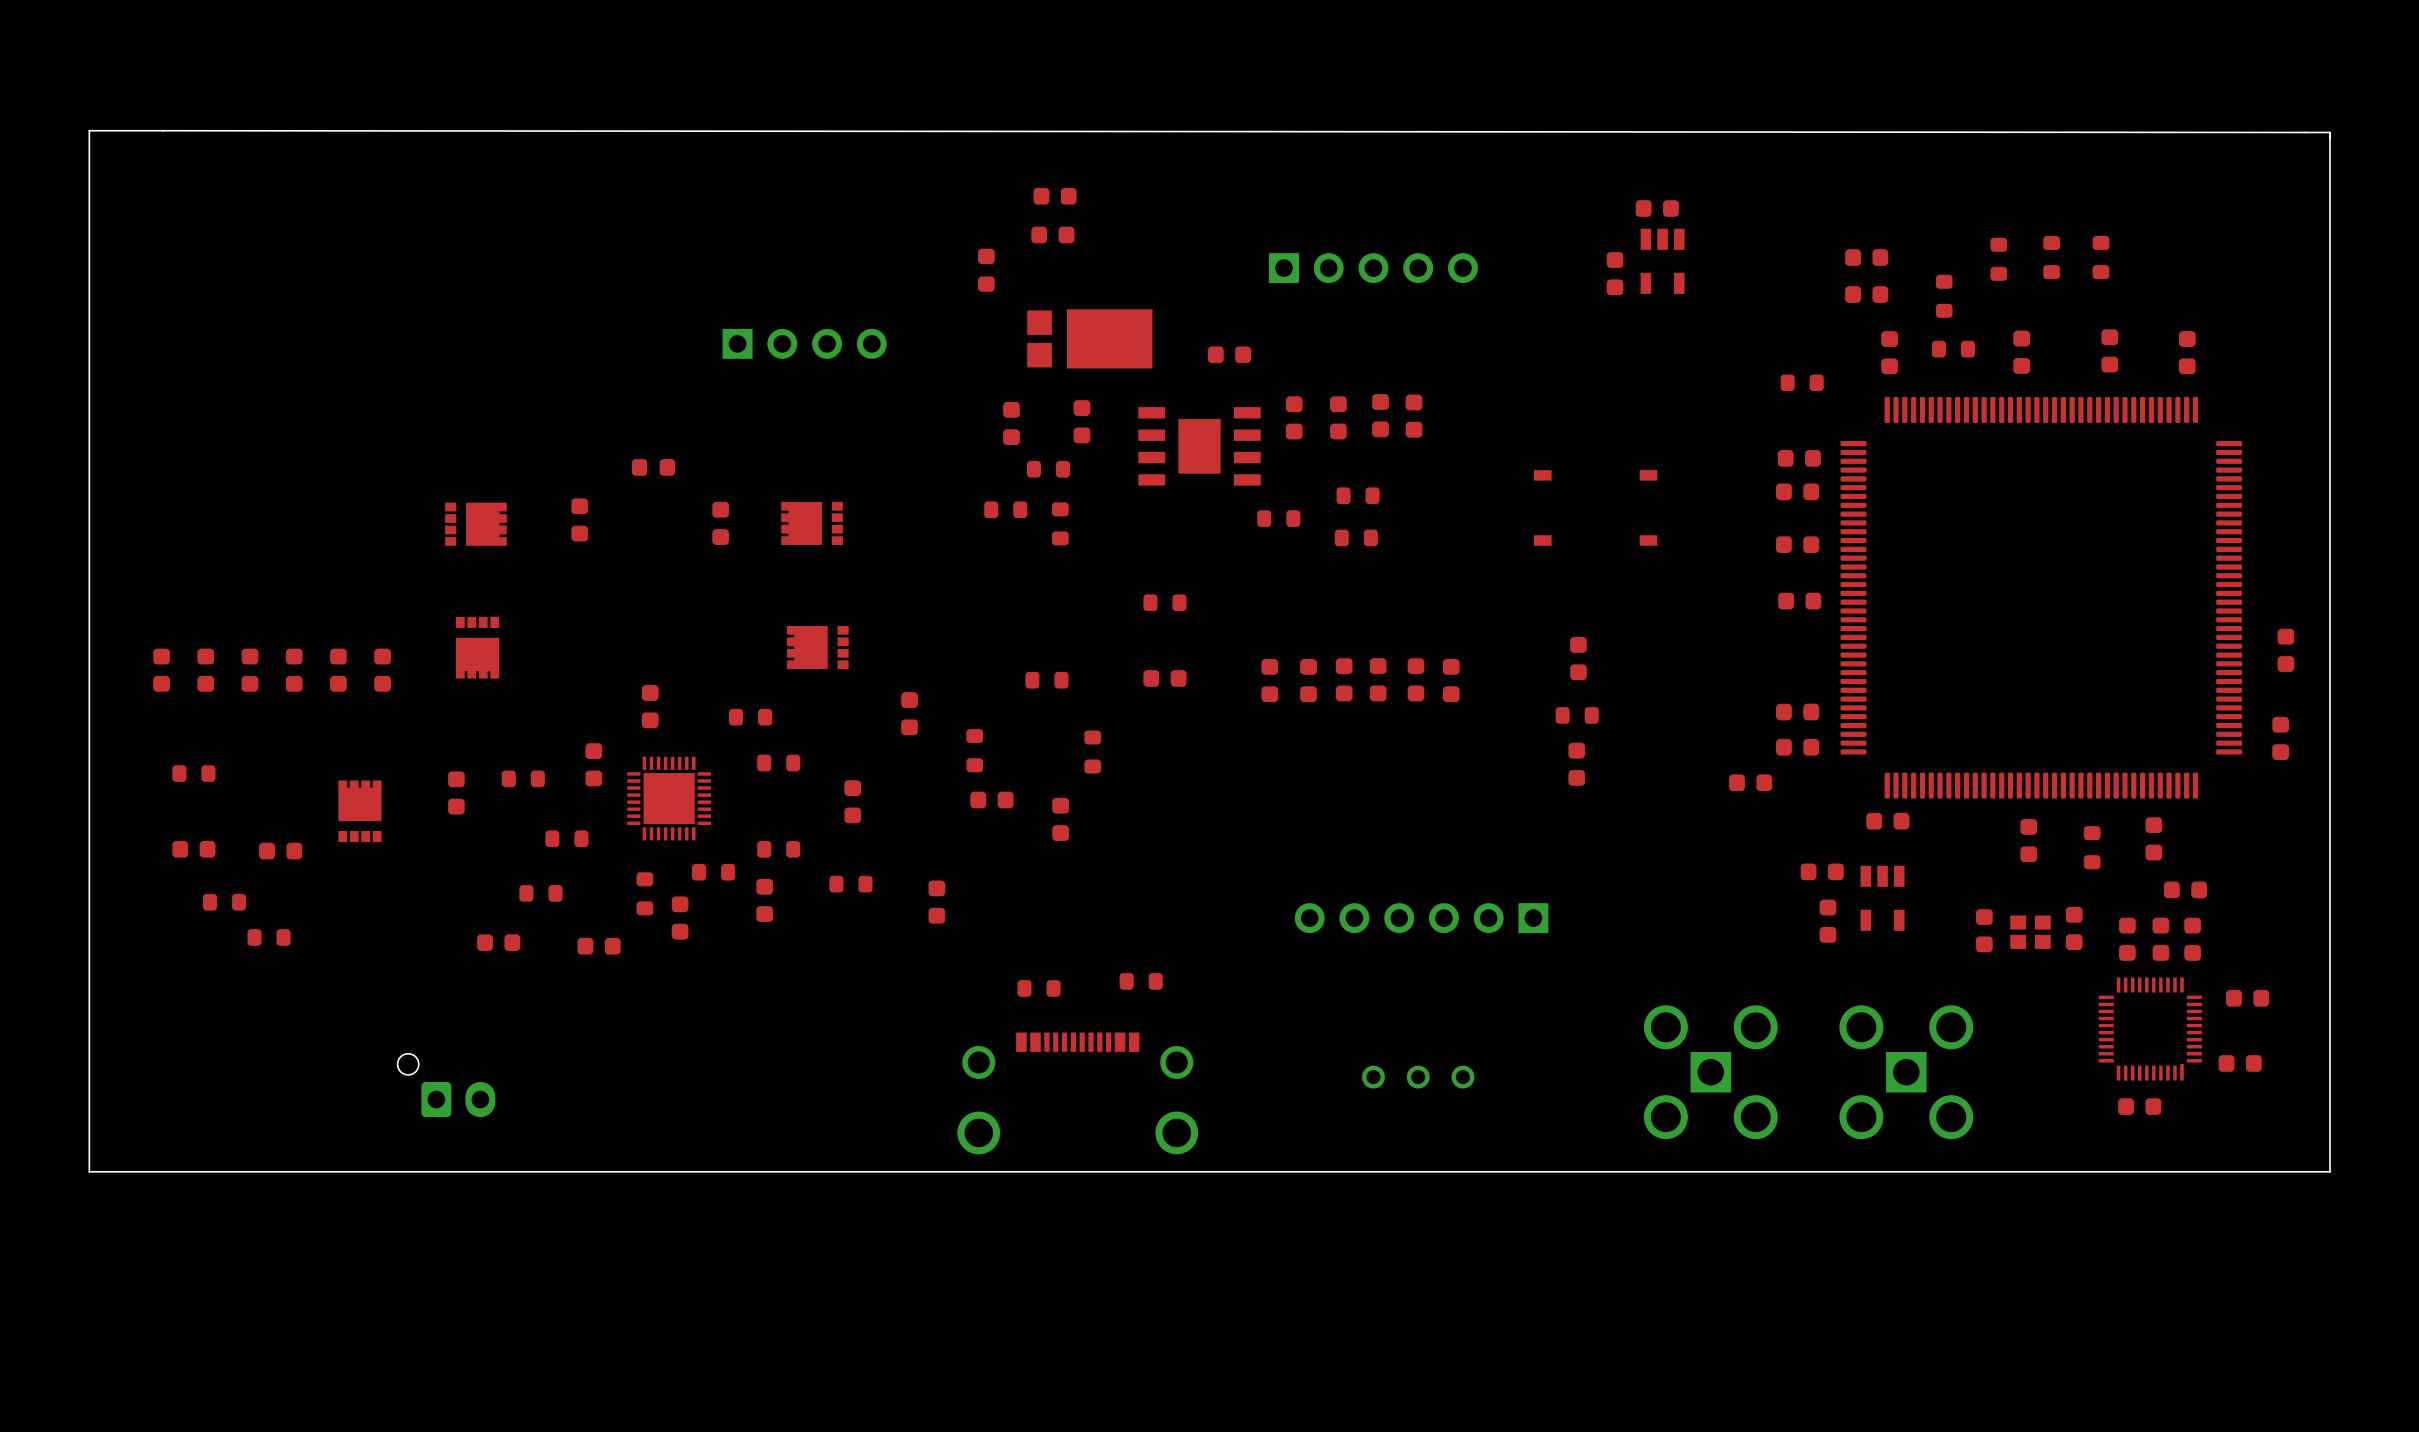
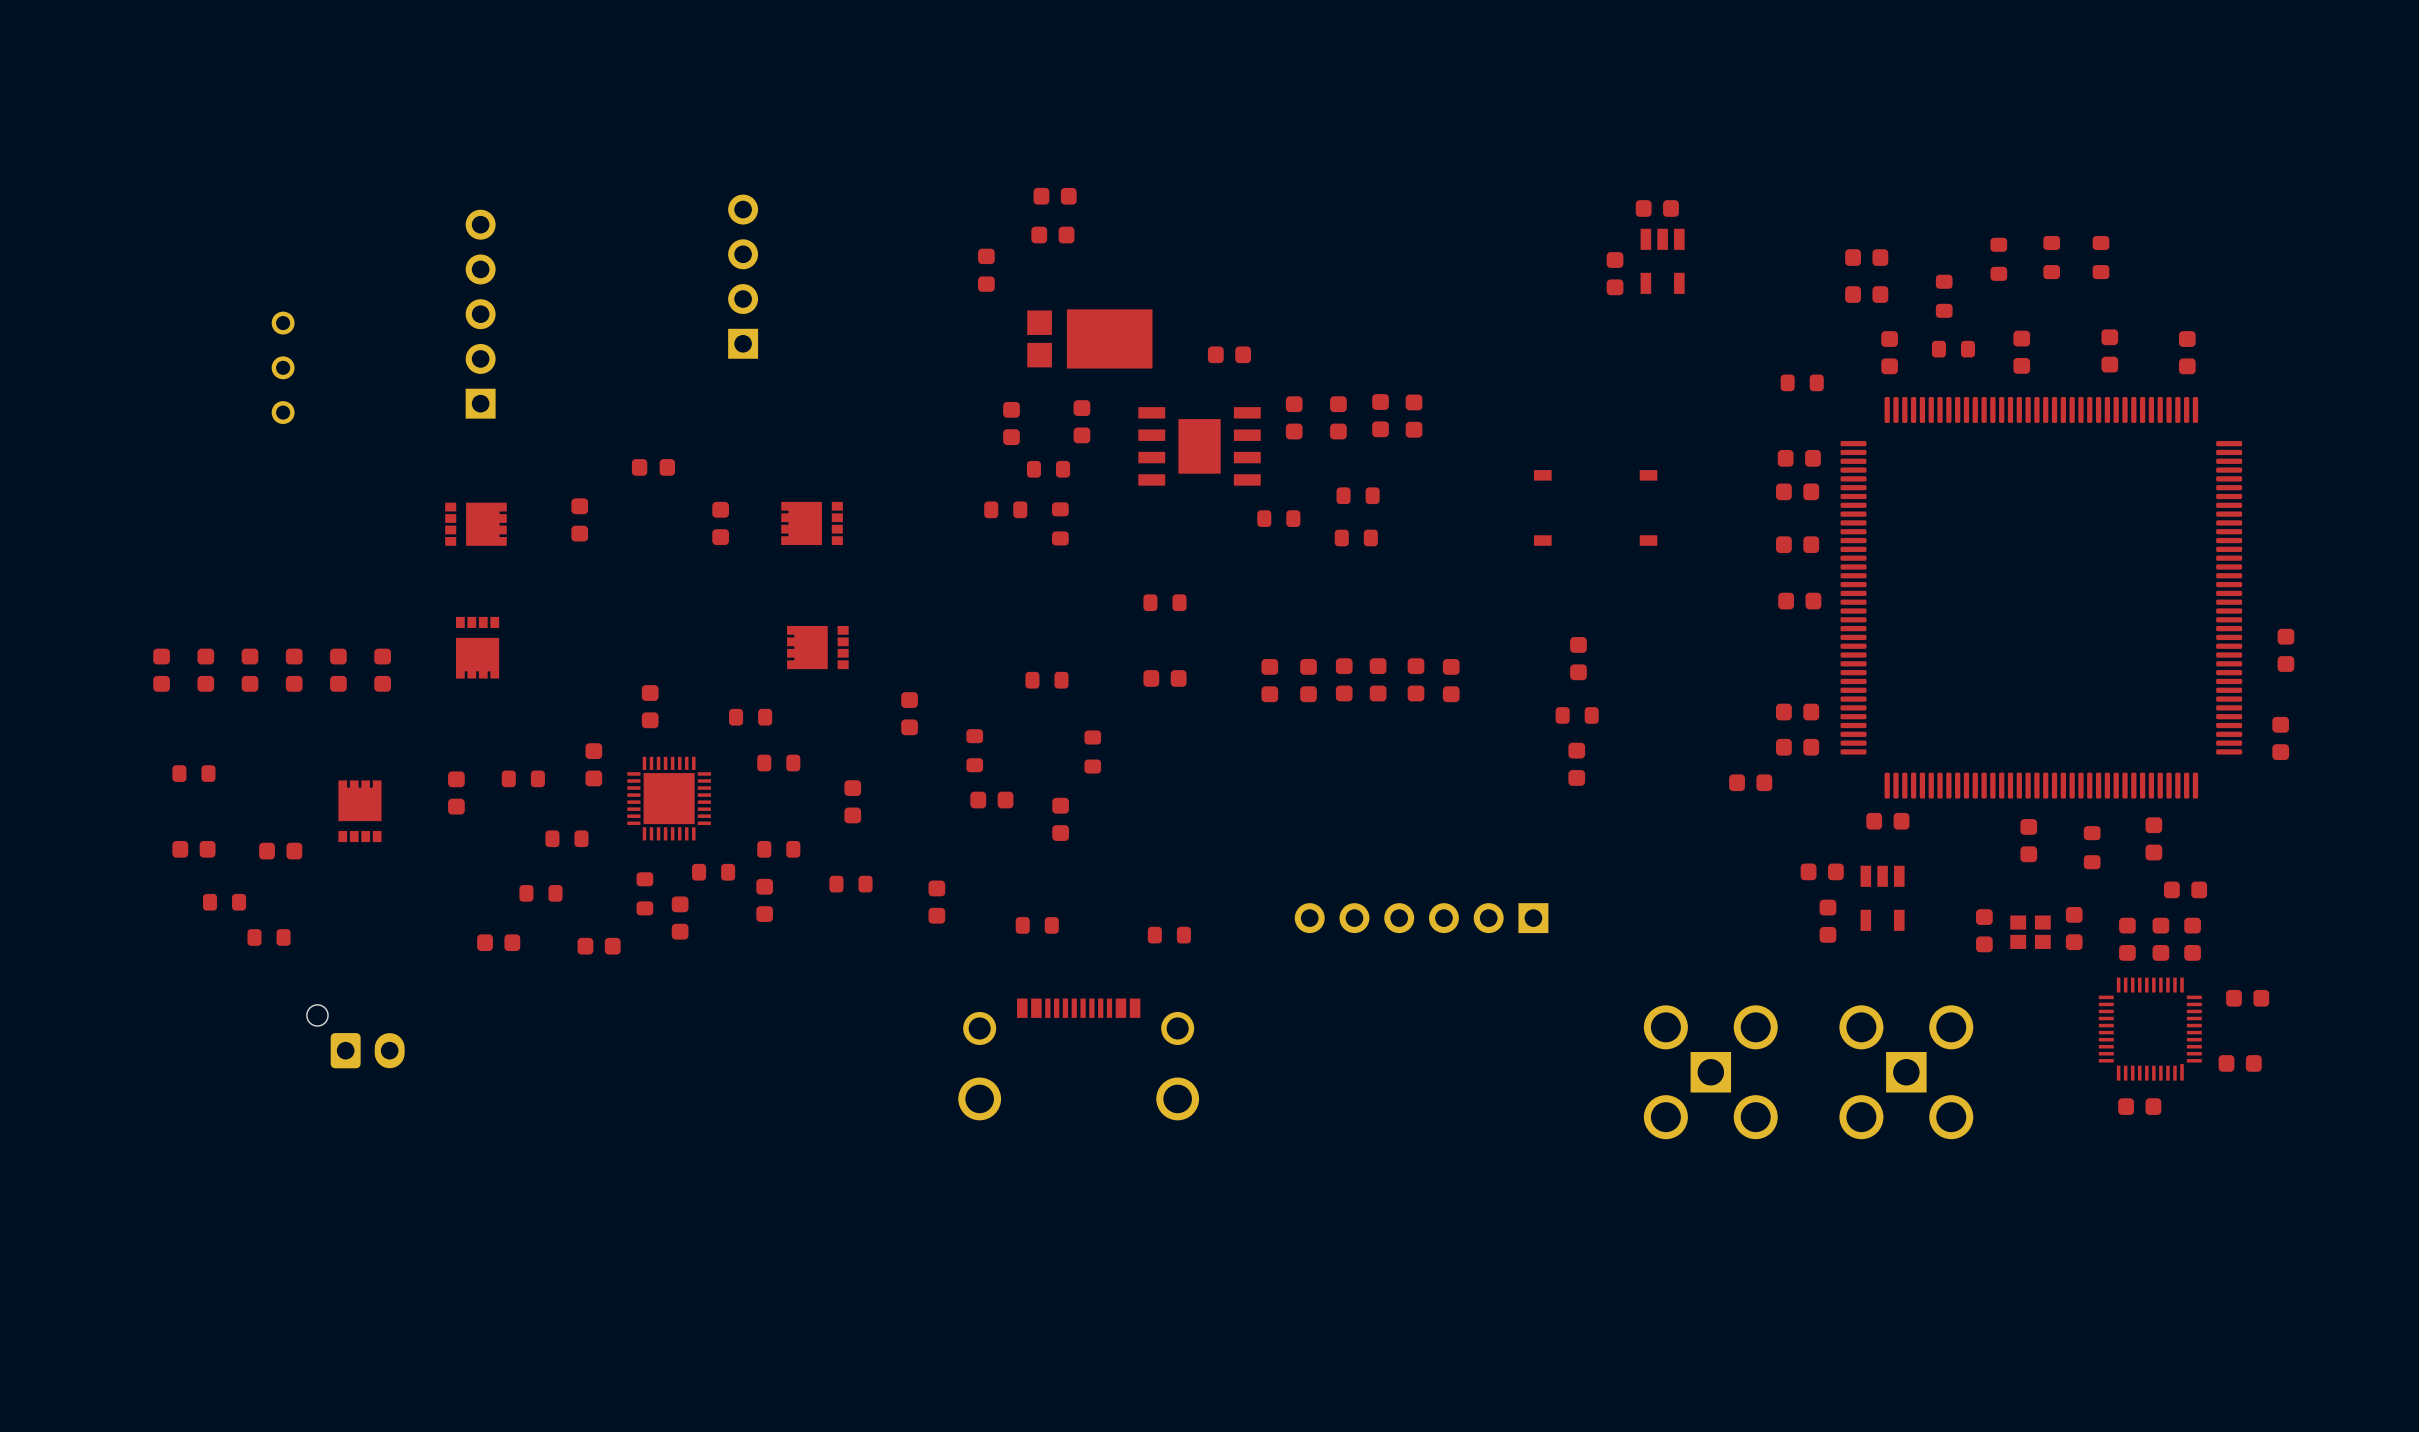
board edge: (163, 130) (2329, 132) (2329, 1171) (89, 1171) (89, 130) (163, 130) -> none
part: (1373, 268) -> none
part: none -> (480, 314)
part rotation: 0° (804, 343) -> 90° counterclockwise (743, 276)
part: none -> (283, 367)
part: none -> (1037, 925)
part position: (1141, 981) -> (1169, 935)
part: (1039, 988) -> none
part: (1418, 1077) -> none
part position: (446, 1085) -> (355, 1036)
part position: (1077, 1093) -> (1078, 1059)

